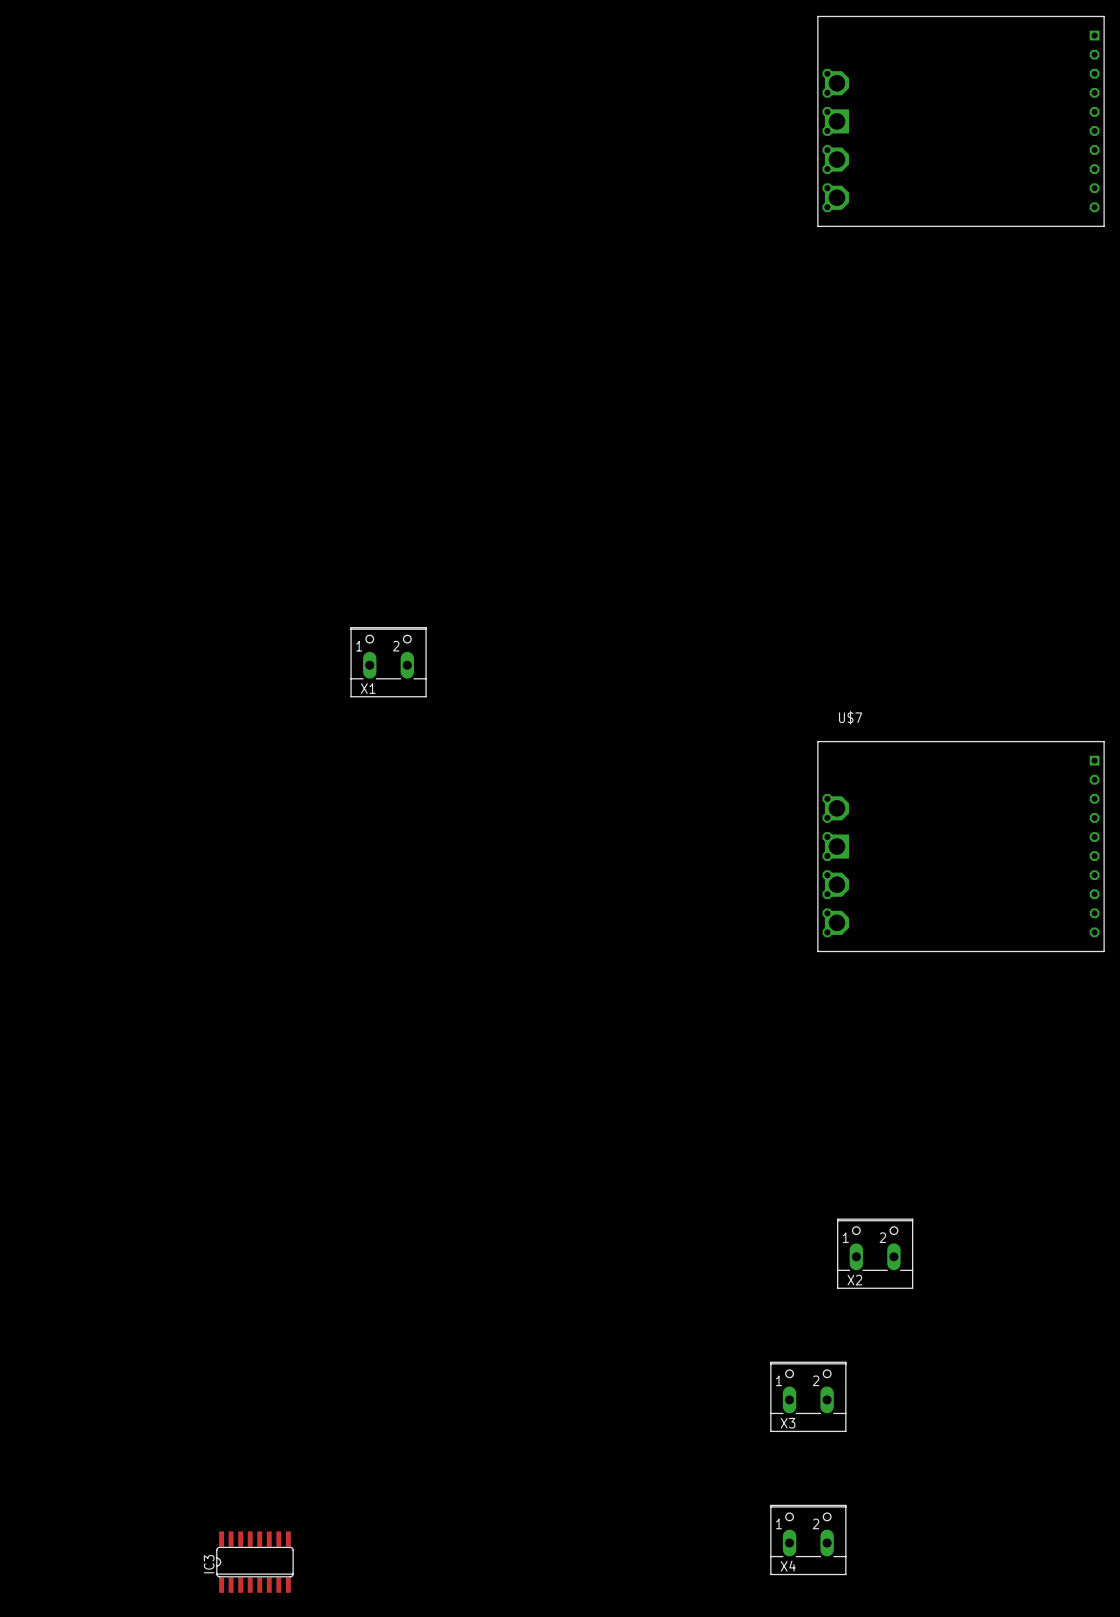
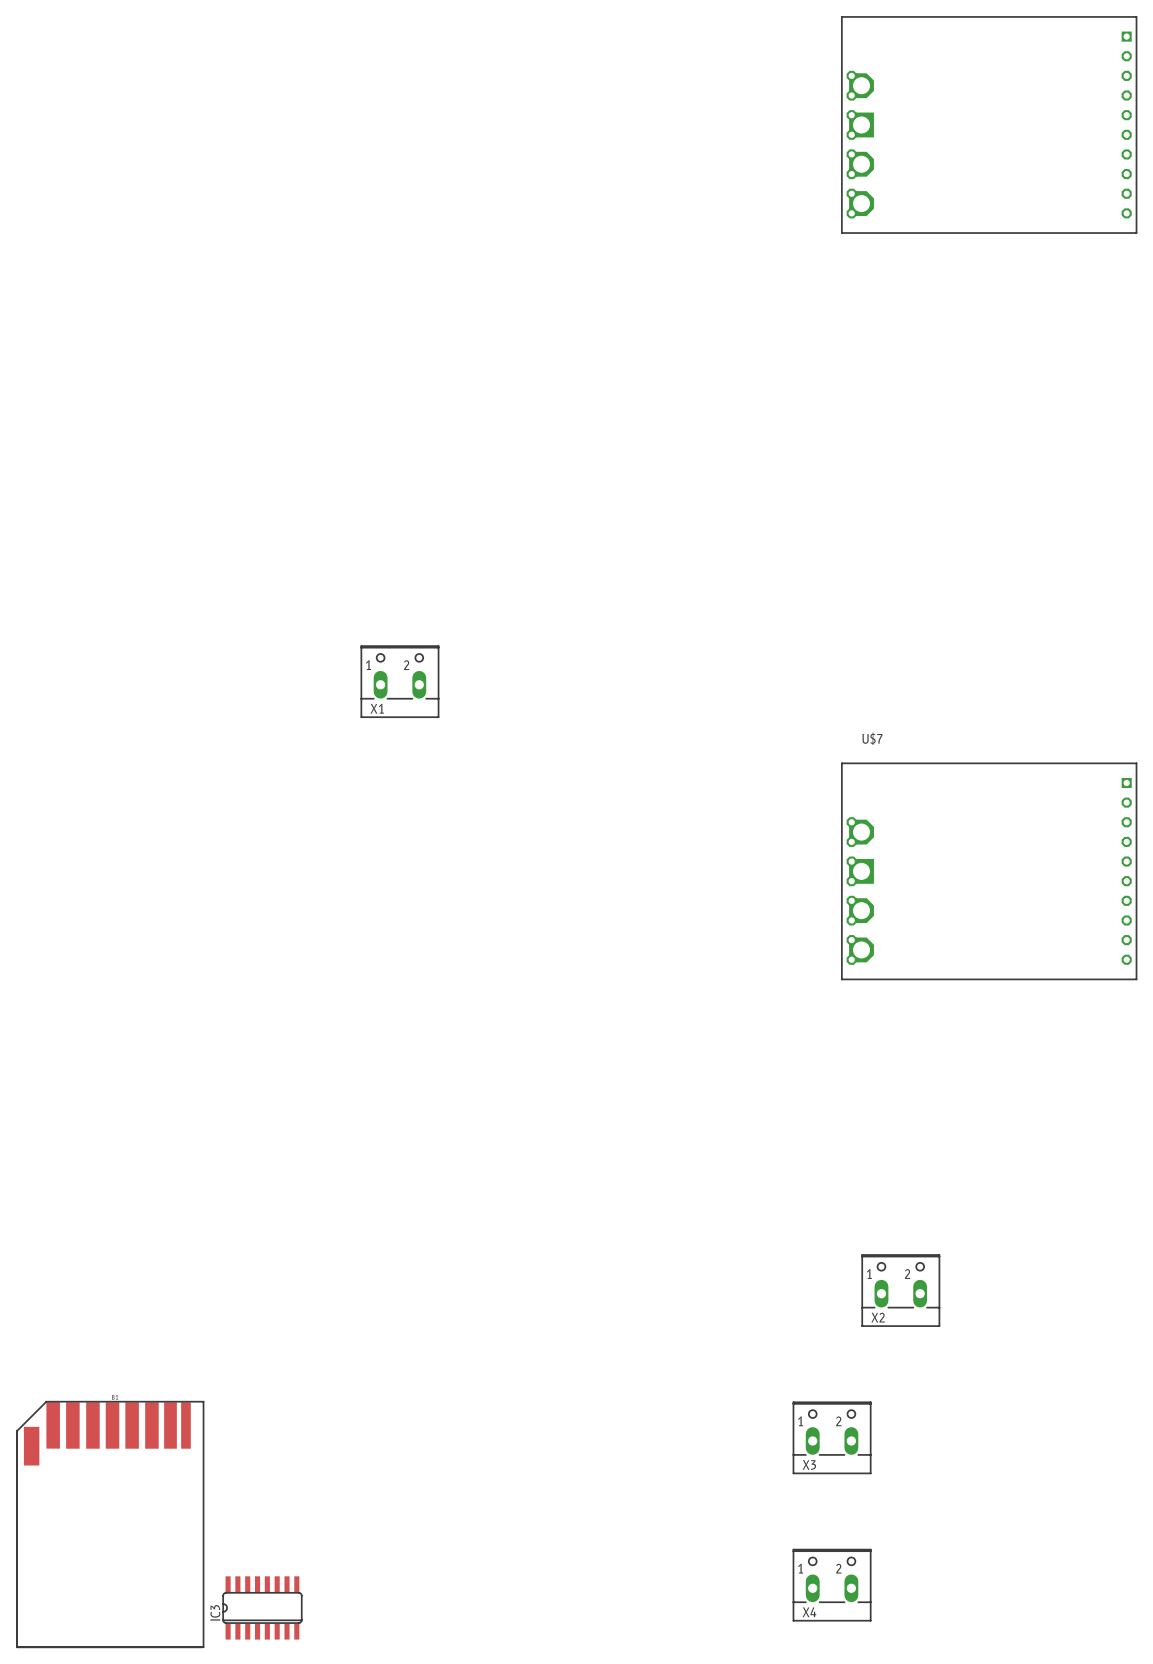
part: none -> (110, 1524)

